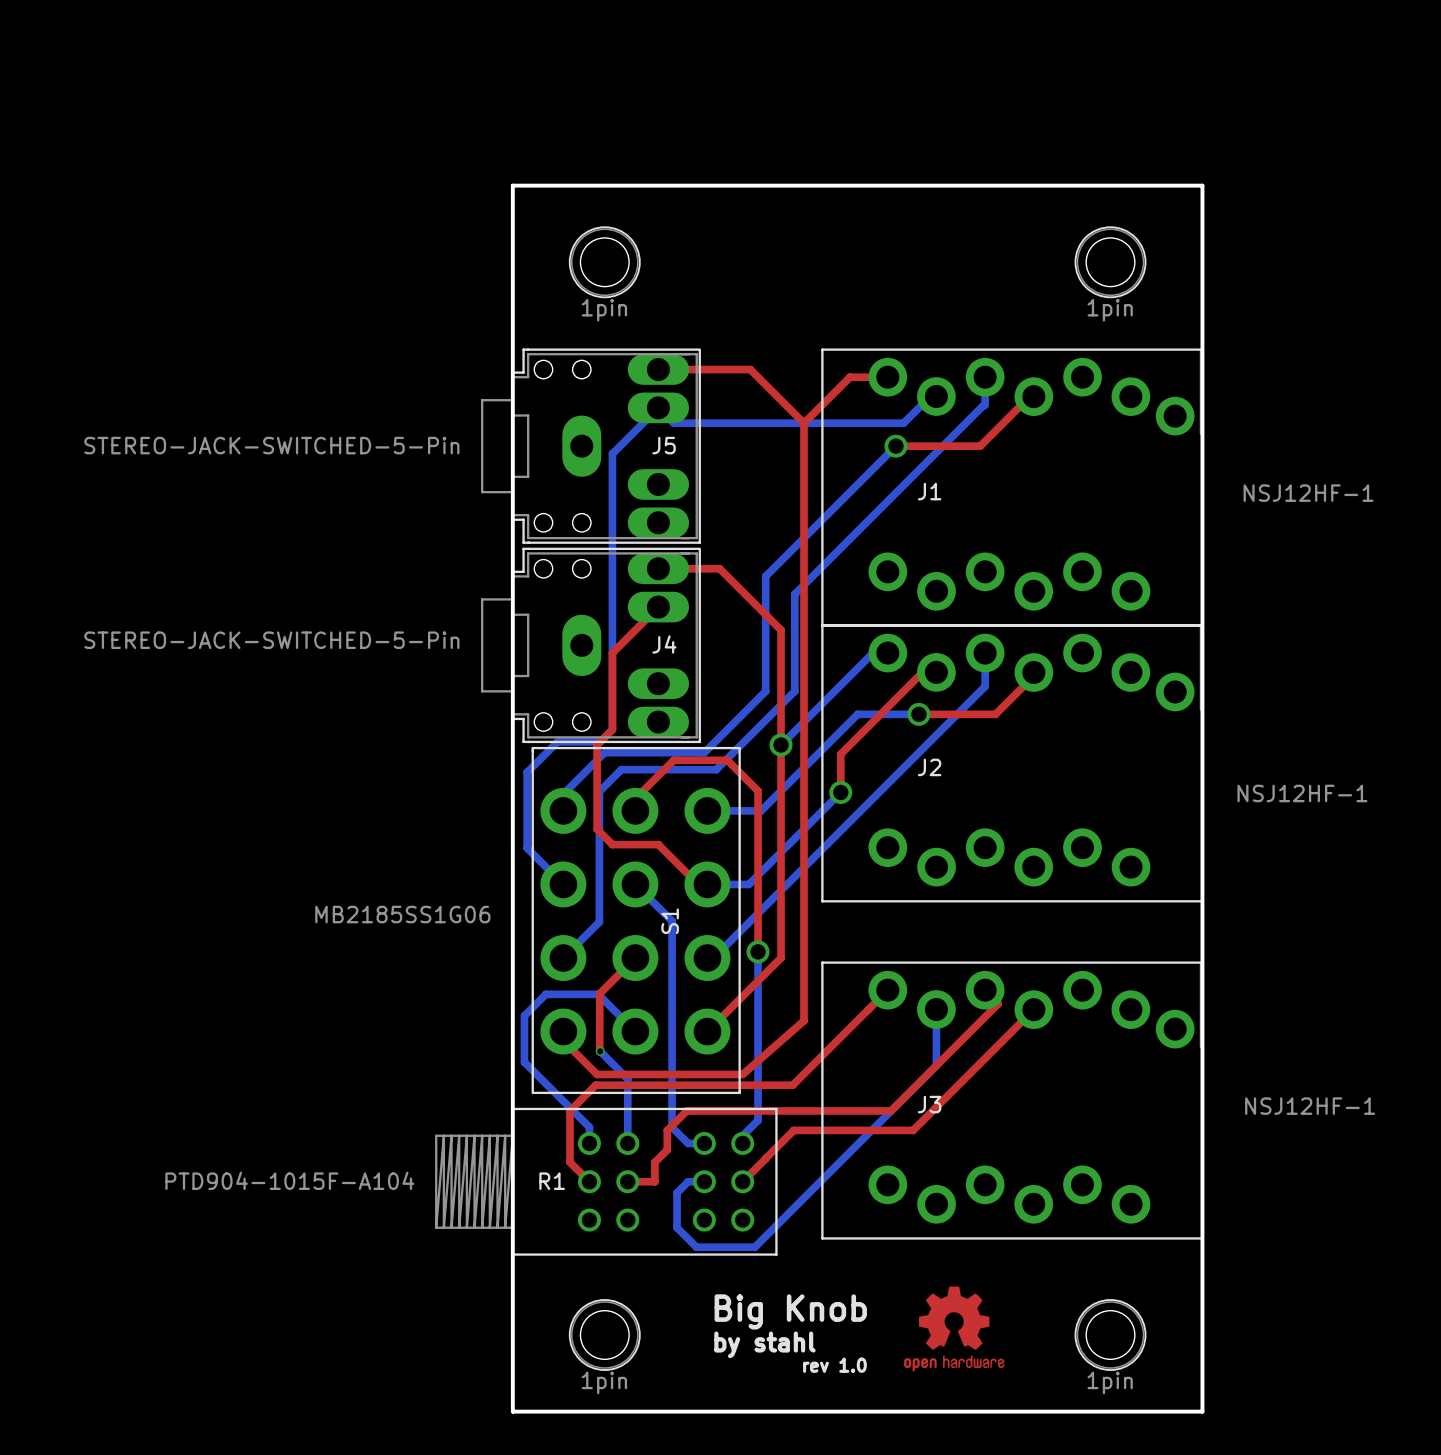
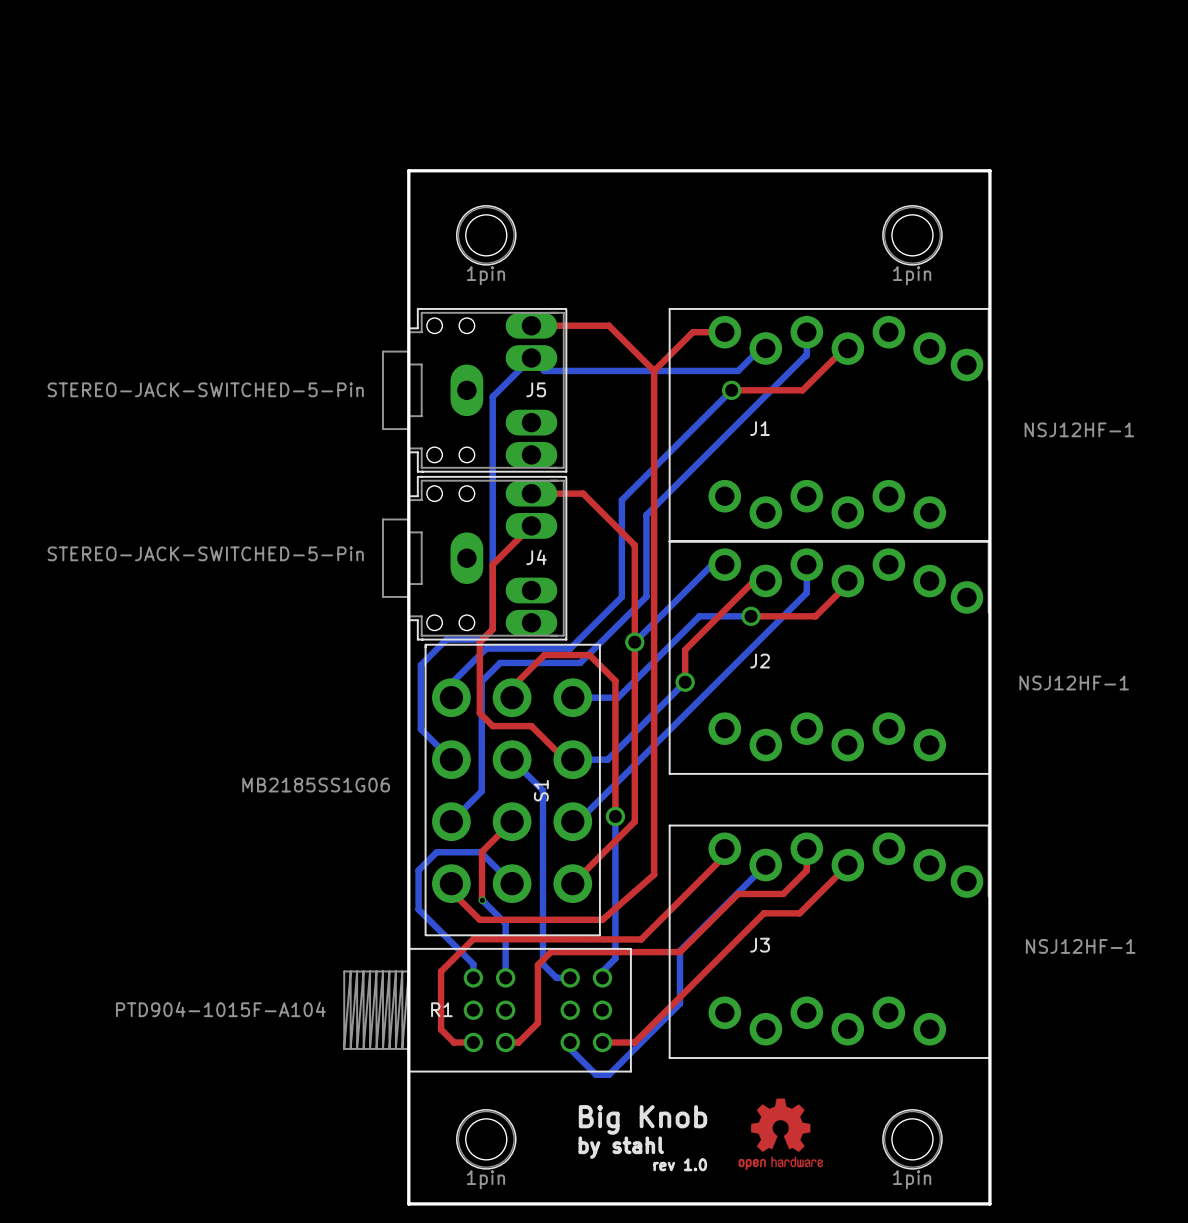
top track: (887, 990) (792, 1085) (595, 1085) (569, 1110) (569, 1162) (589, 1181) -> none
top track: none -> (731, 849) (641, 939) (473, 939) (441, 971) (441, 1029) (453, 1042) (473, 1042)
top track: (985, 990) (998, 1003) (891, 1110) (686, 1110) (667, 1130) (667, 1149) (654, 1162) (654, 1181) (627, 1181) -> (806, 849) (806, 870) (783, 893) (738, 893) (679, 952) (550, 952) (537, 965) (537, 1023) (518, 1042) (505, 1042)
bottom track: (936, 1009) (936, 1065) (754, 1247) (696, 1247) (677, 1227) (677, 1192) (688, 1181) (704, 1181) -> (765, 865) (679, 950) (679, 1003) (608, 1074) (596, 1074) (570, 1048) (570, 1042)
top track: (976, 1066) (913, 1130) (793, 1130) (765, 1158) -> (799, 913) (763, 913) (634, 1042) (602, 1042)
top track: (765, 1158) (742, 1181) -> none

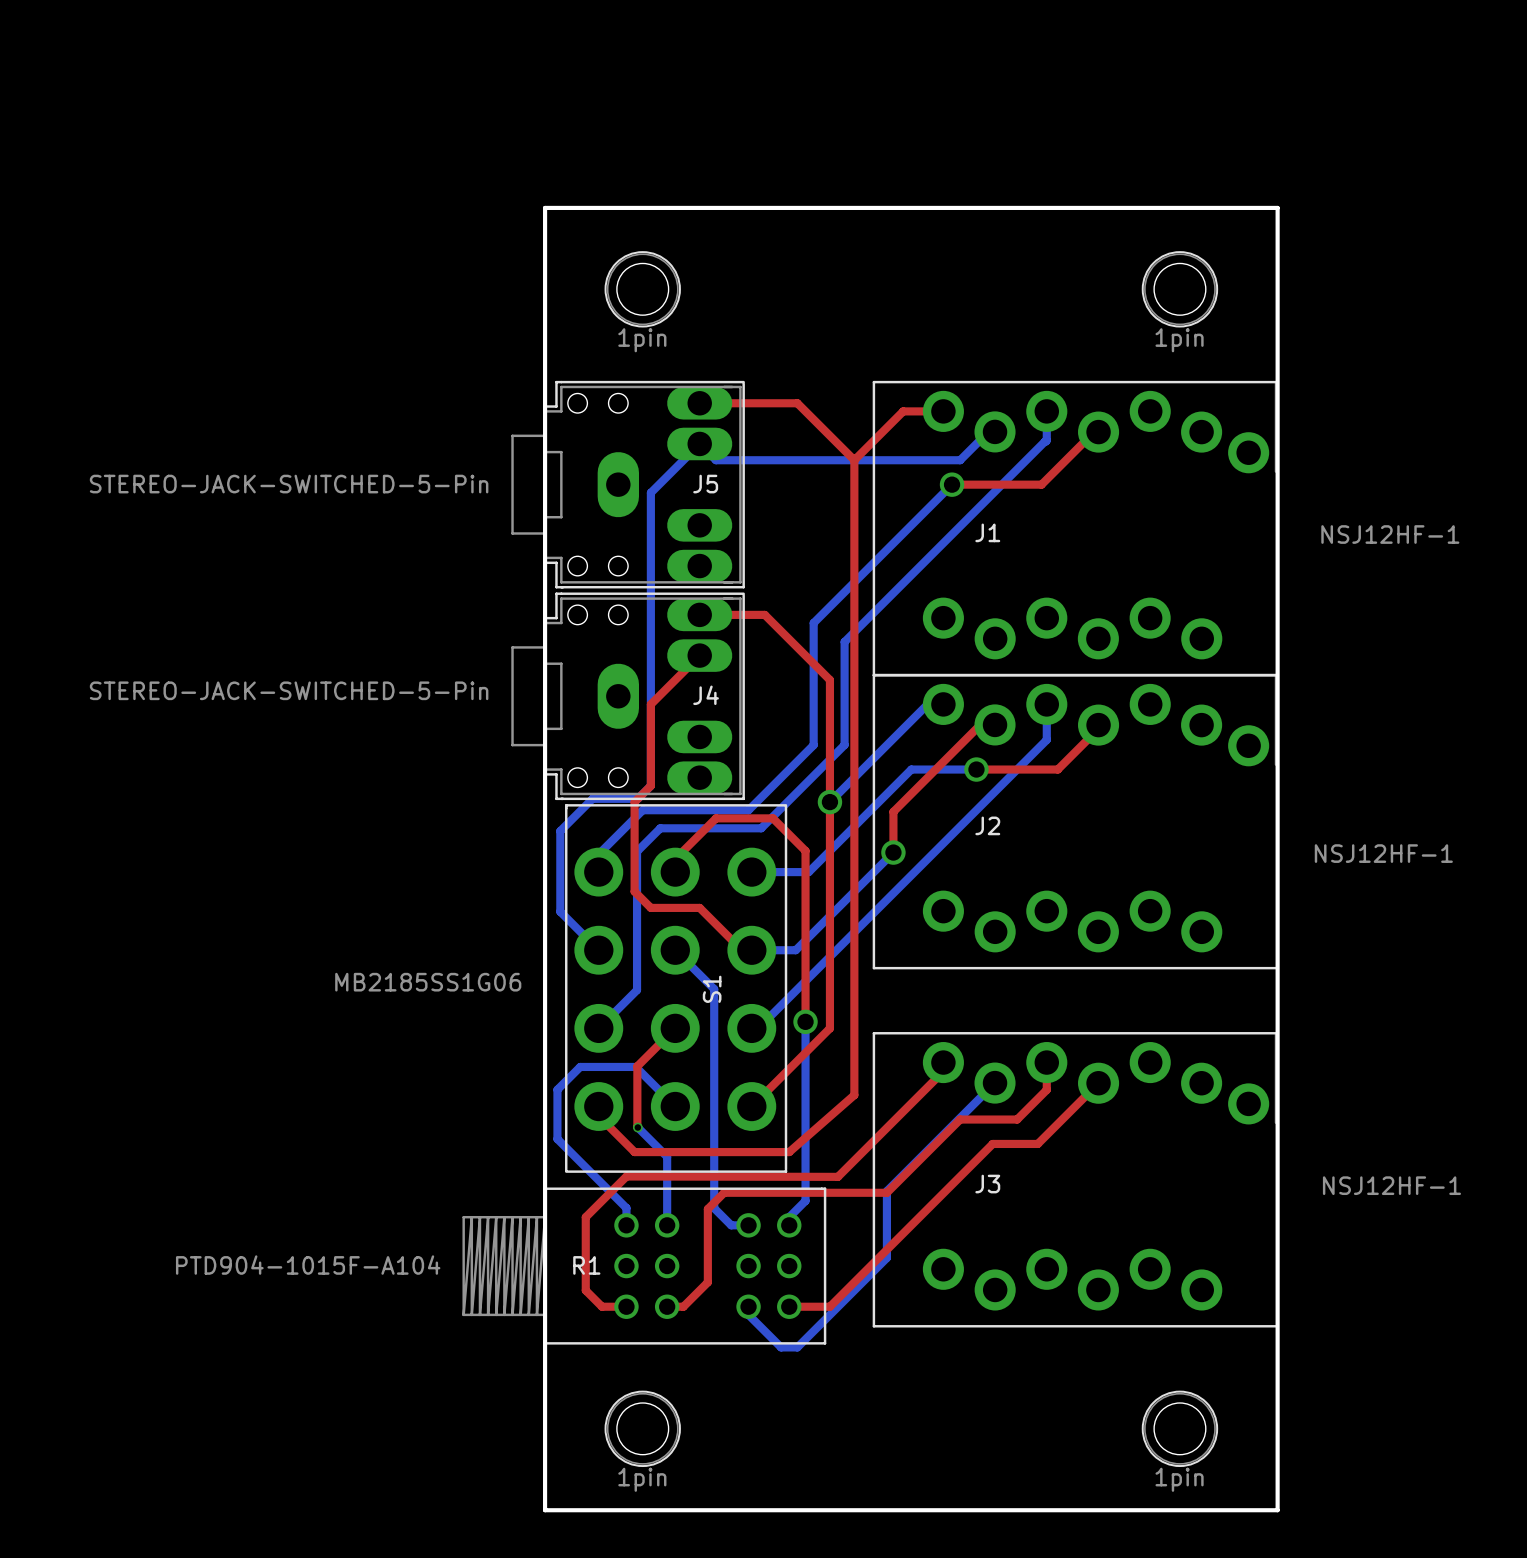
drawing: [738, 1098, 823, 1171] -> none
text: Big Knob (643, 1119) -> none
text: by stahl (621, 1147) -> none
text: rev 1.0 (680, 1164) -> none

